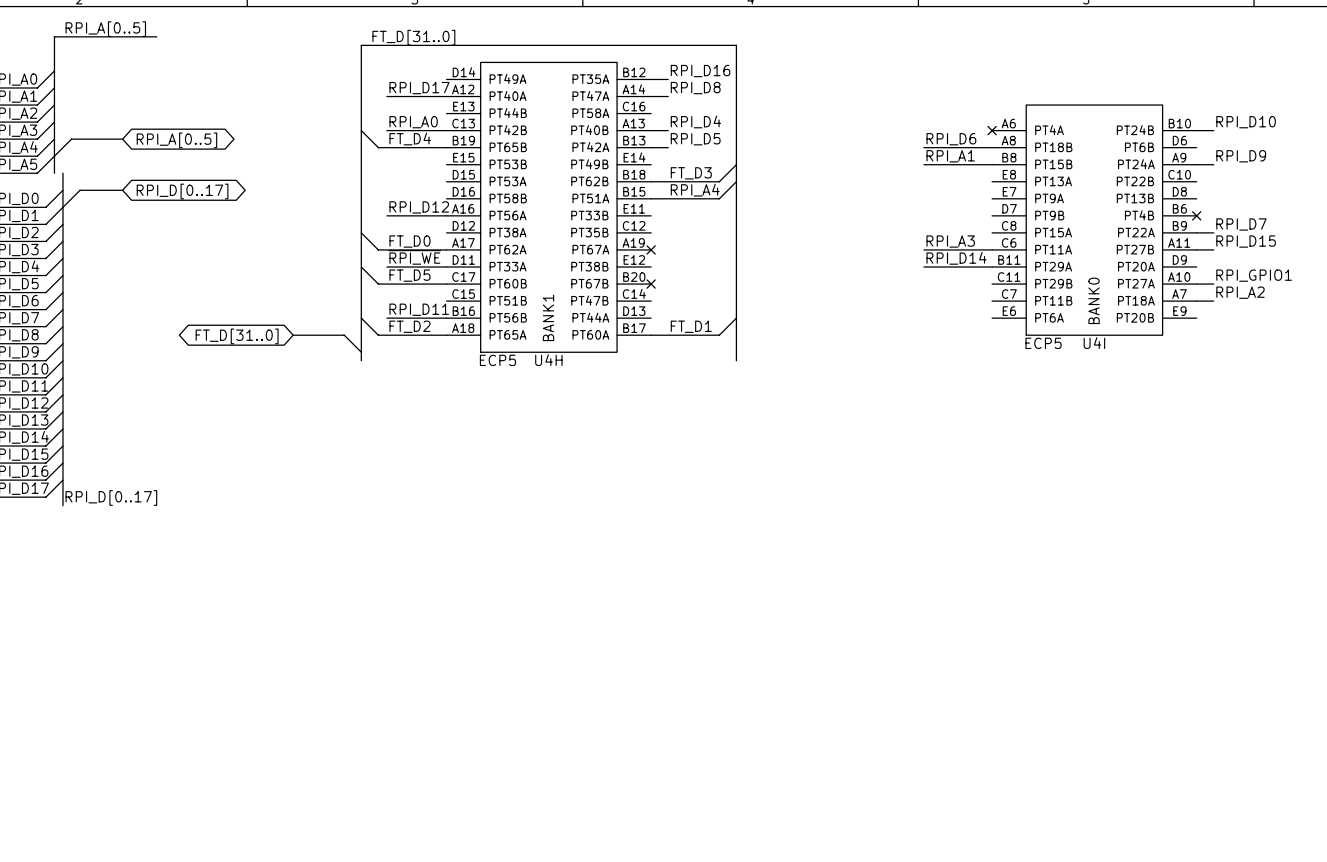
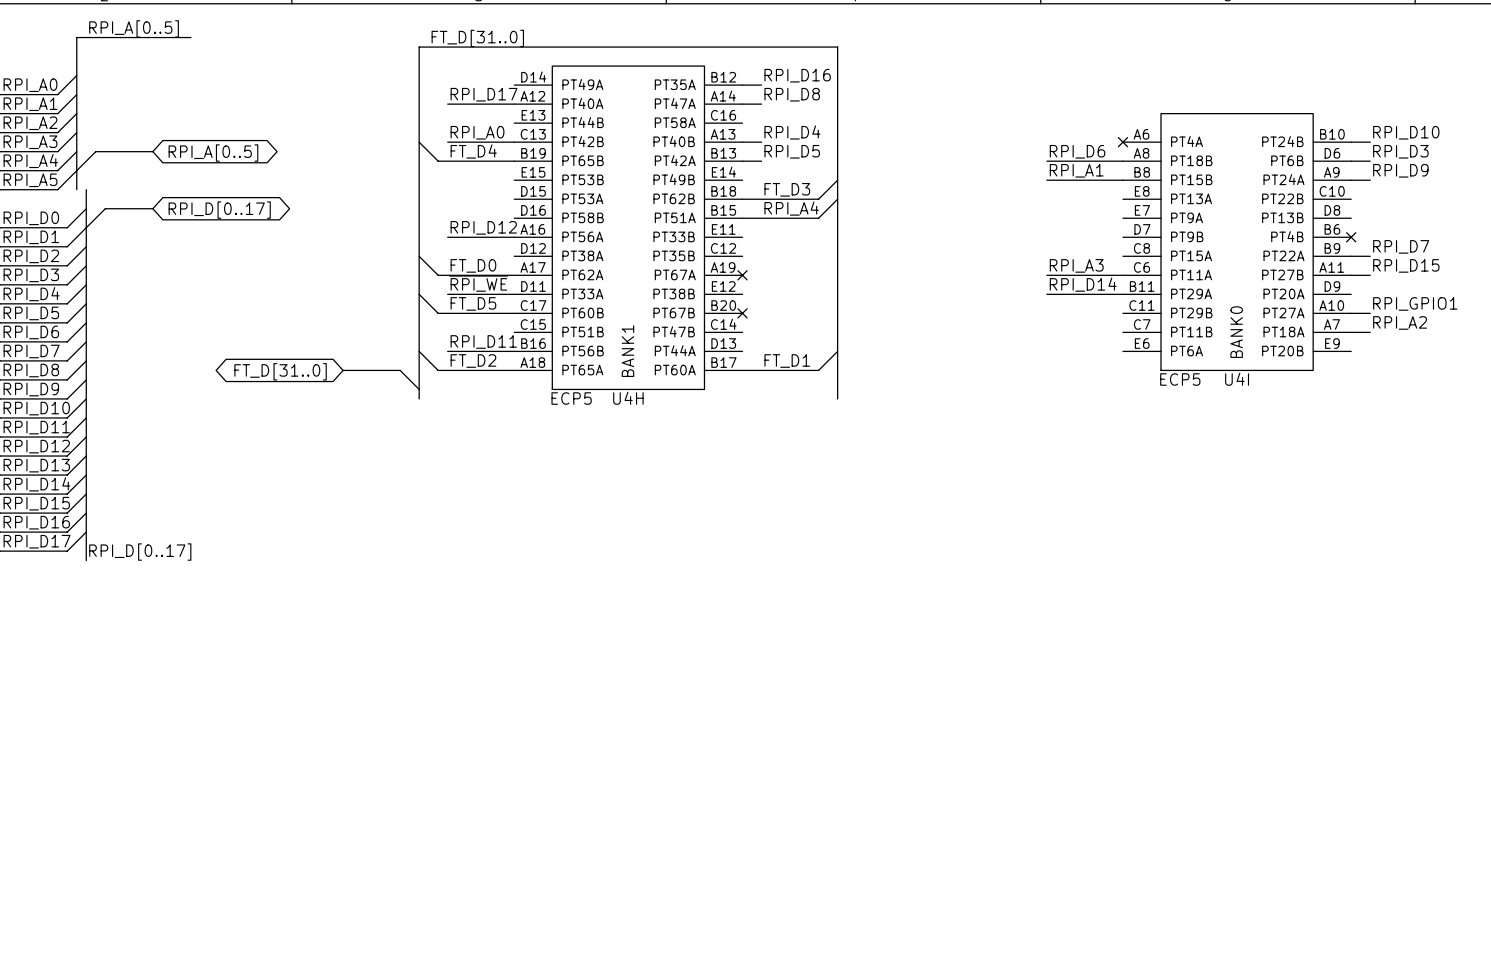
label: none -> RPI_D3 (1400, 151)
wire: none -> (1351, 161) (1370, 161)

